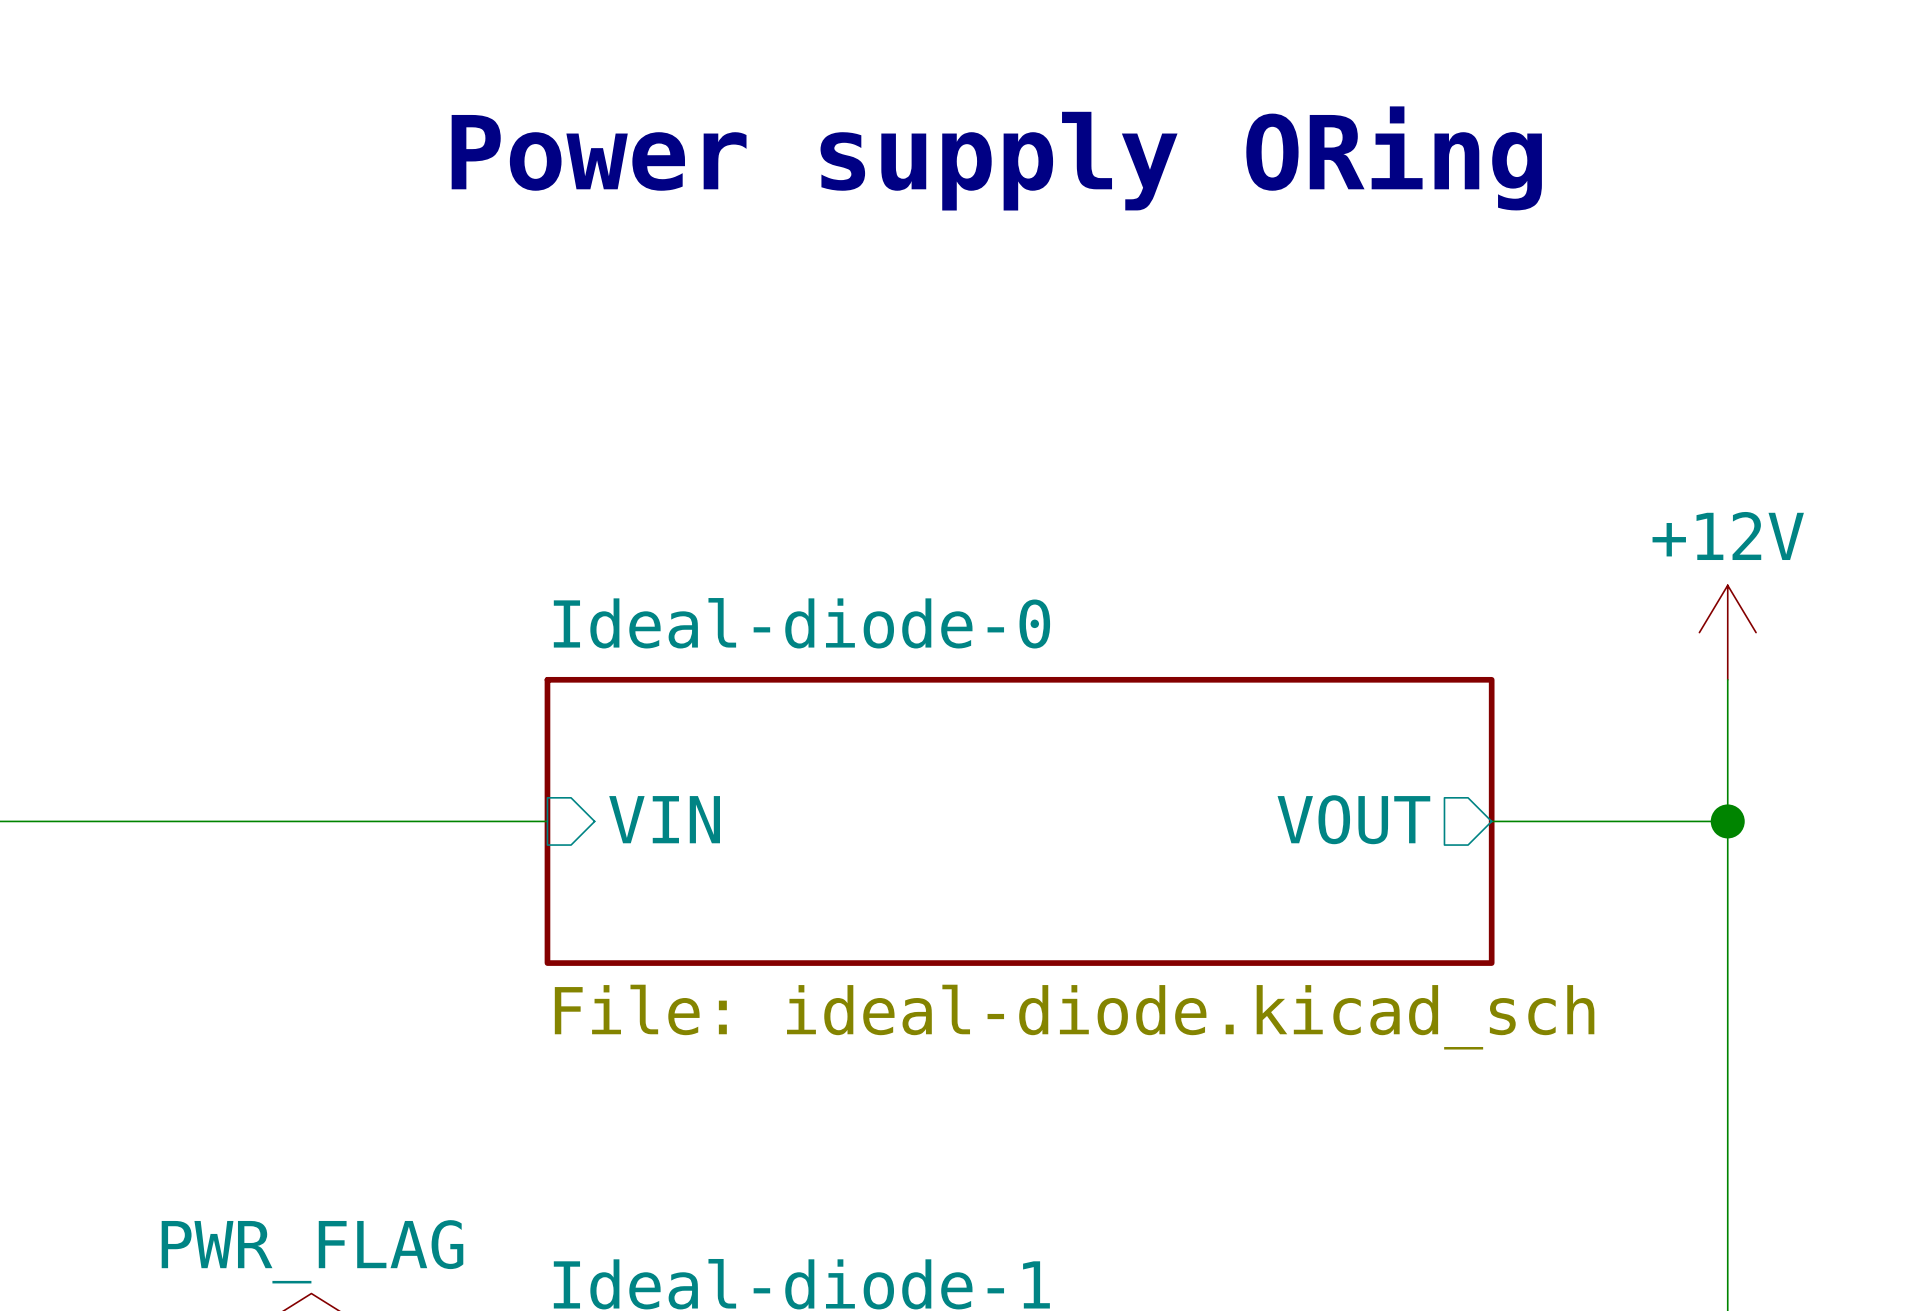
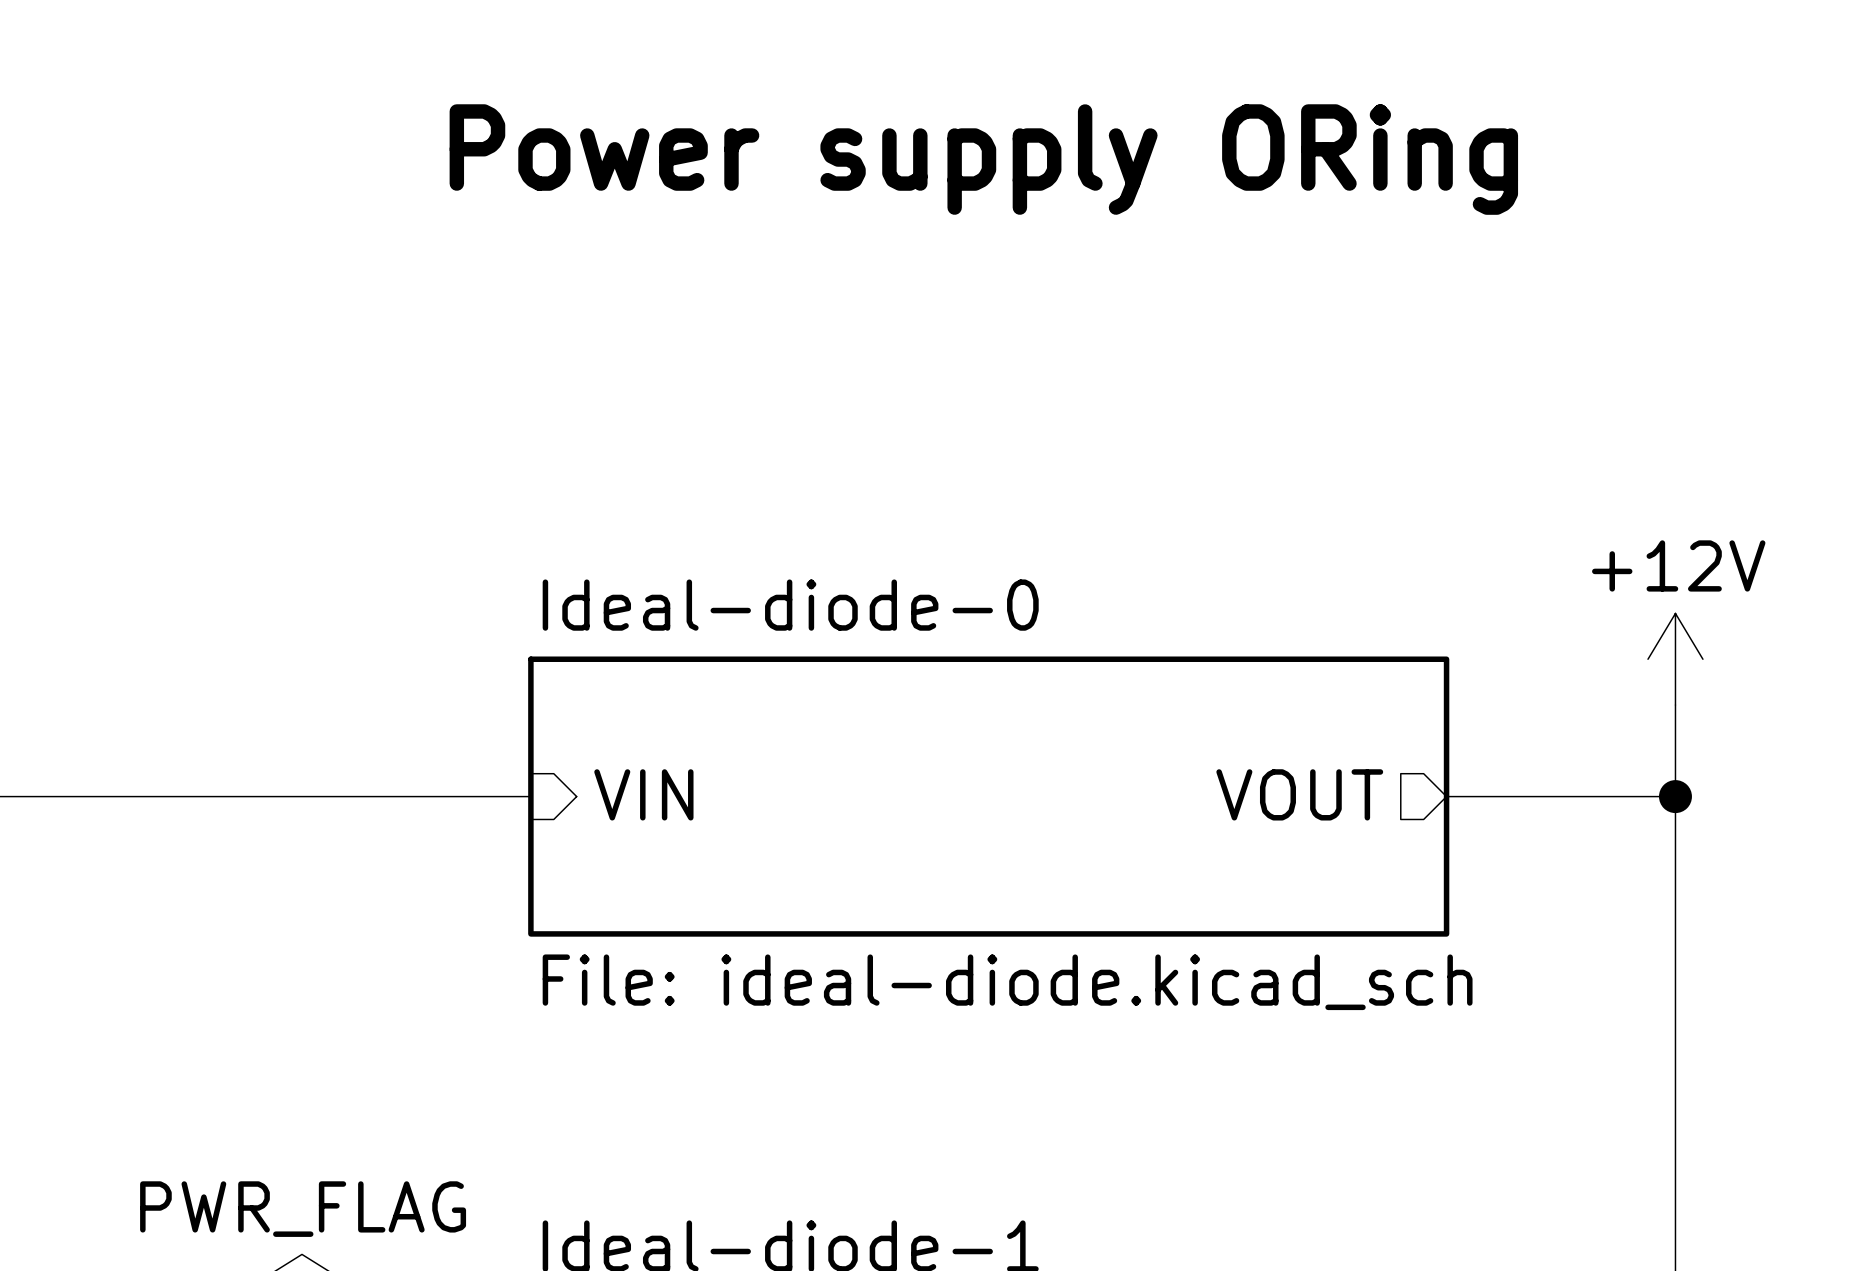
power symbol position: +12V (1727, 632) -> +12V (1675, 659)

